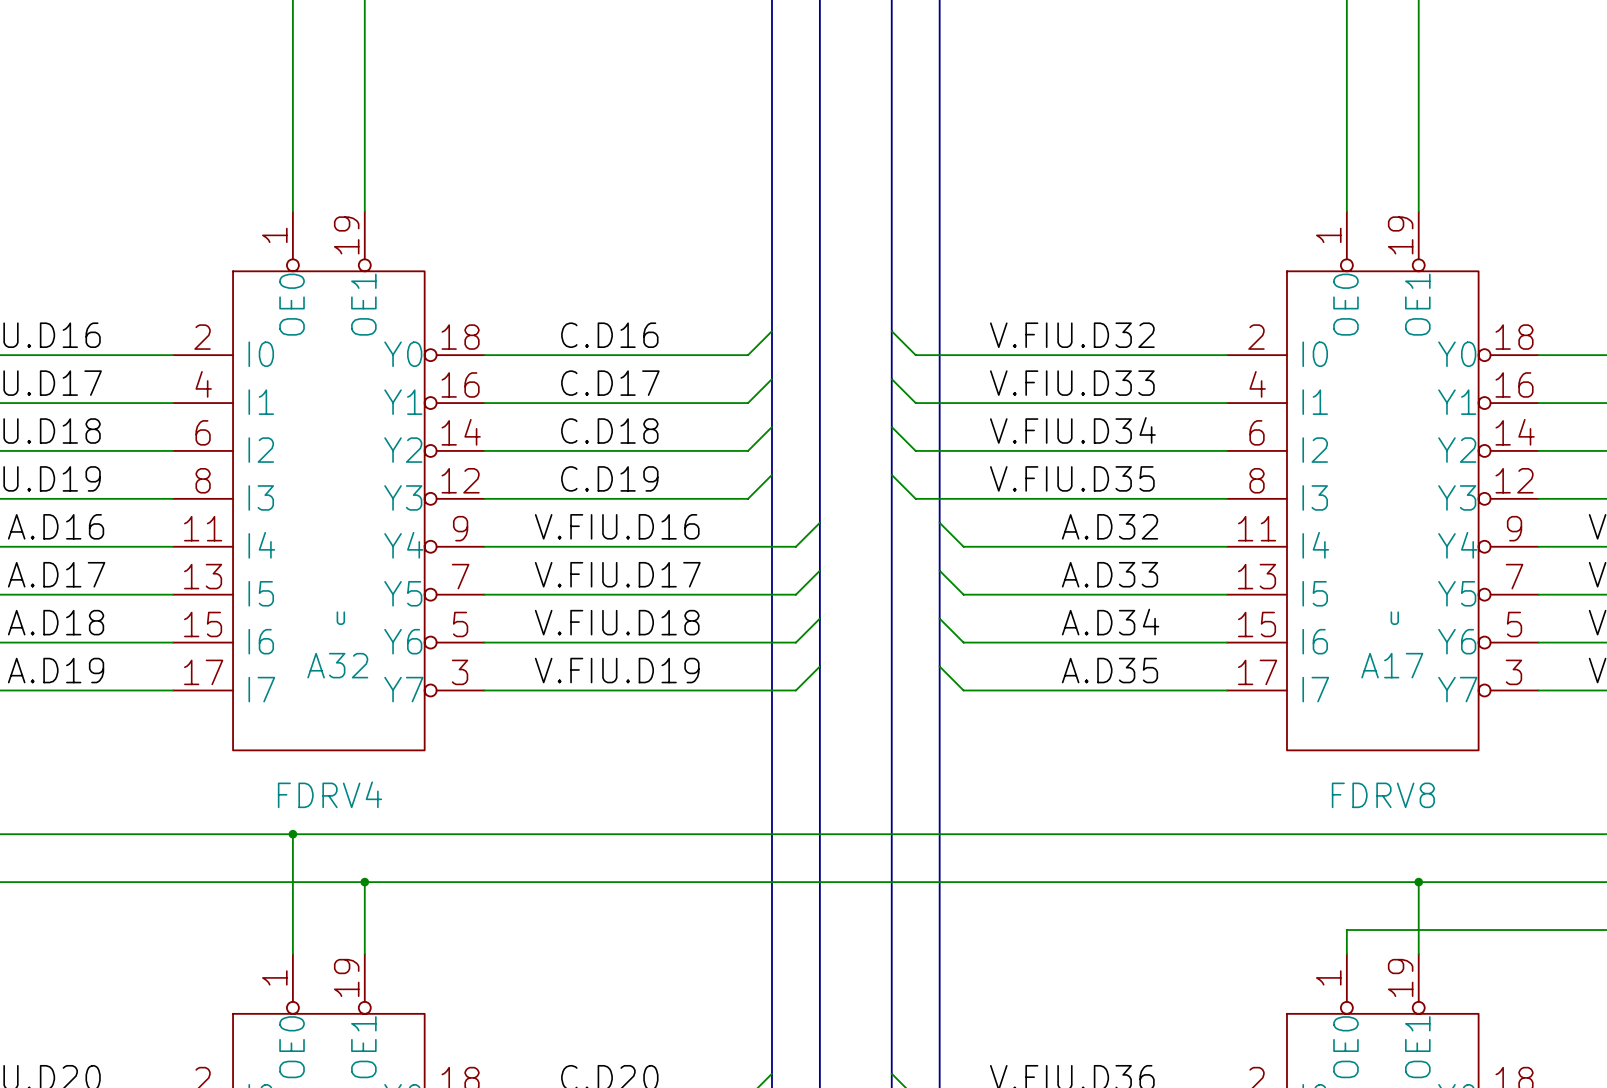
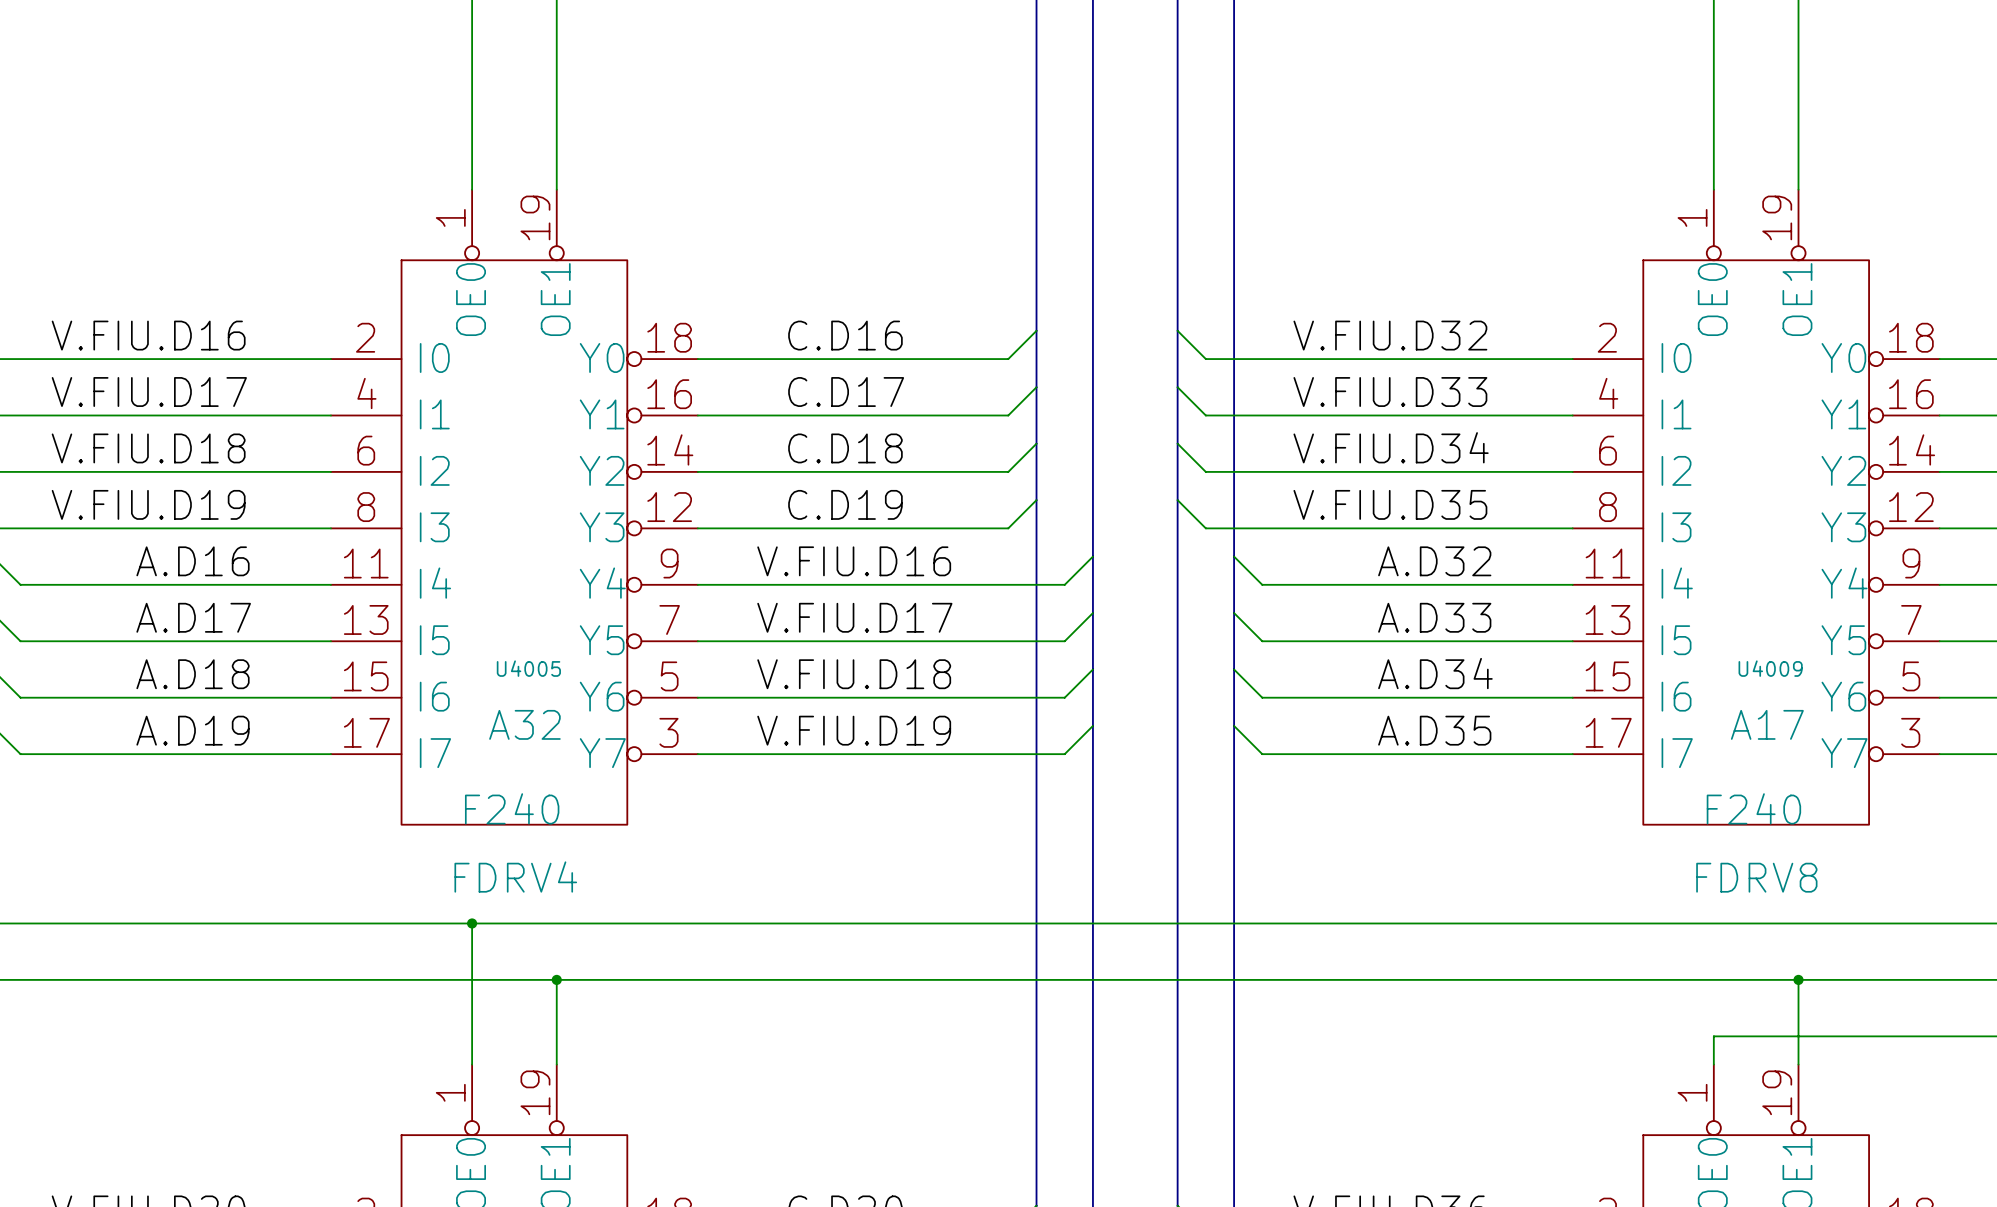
U name: U (340, 618) -> U4005 (528, 668)
U name: U (1394, 618) -> U4009 (1770, 668)
U value: none -> F240 (512, 808)
U value: none -> F240 (1753, 808)

